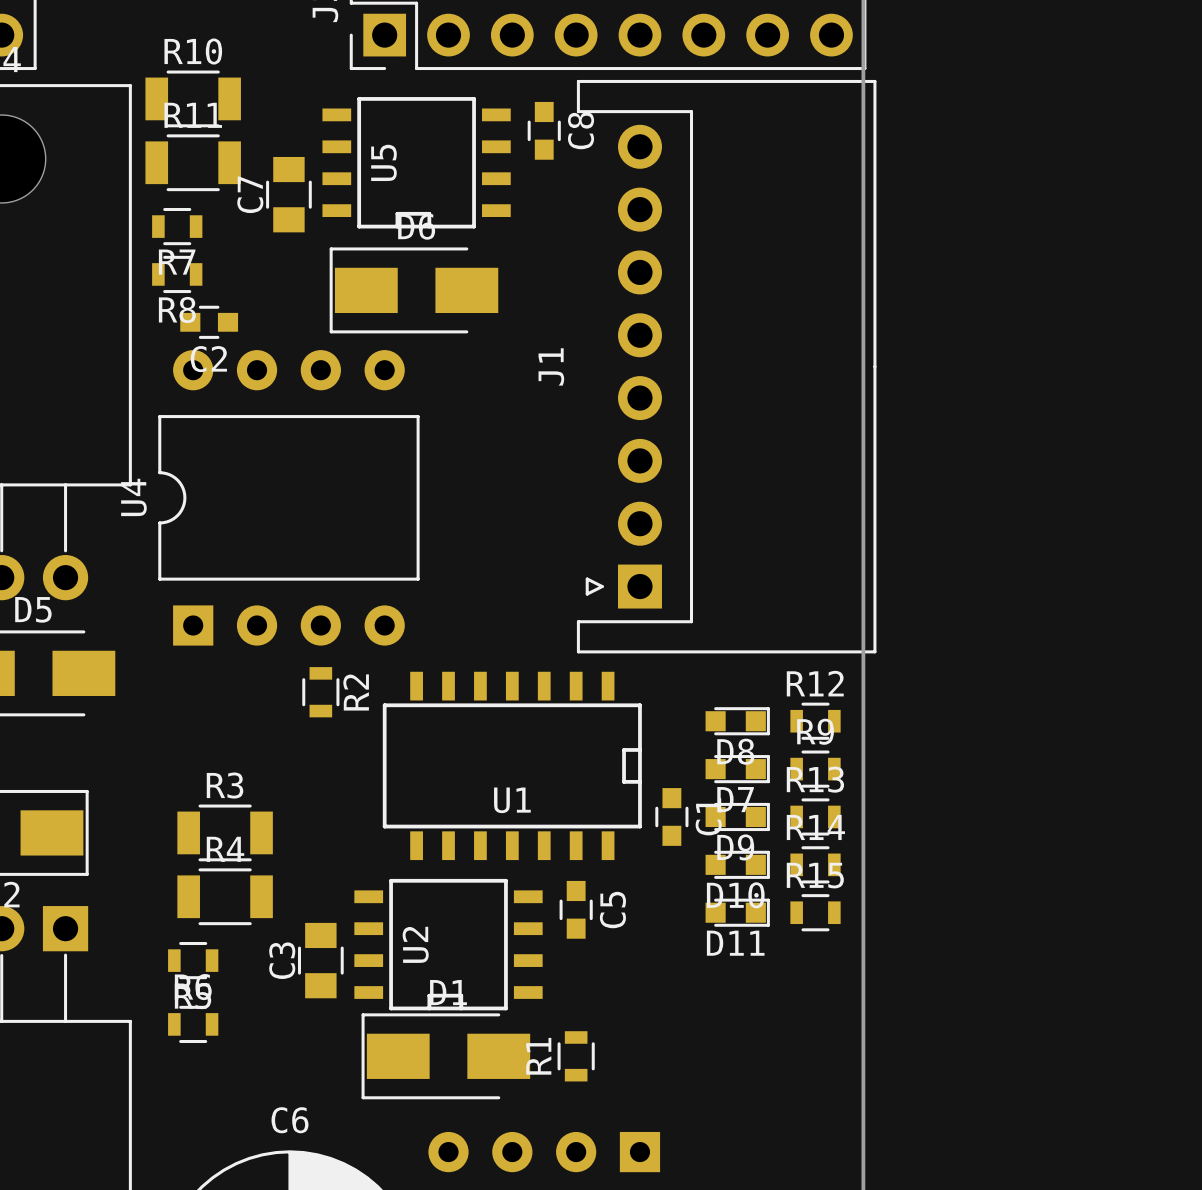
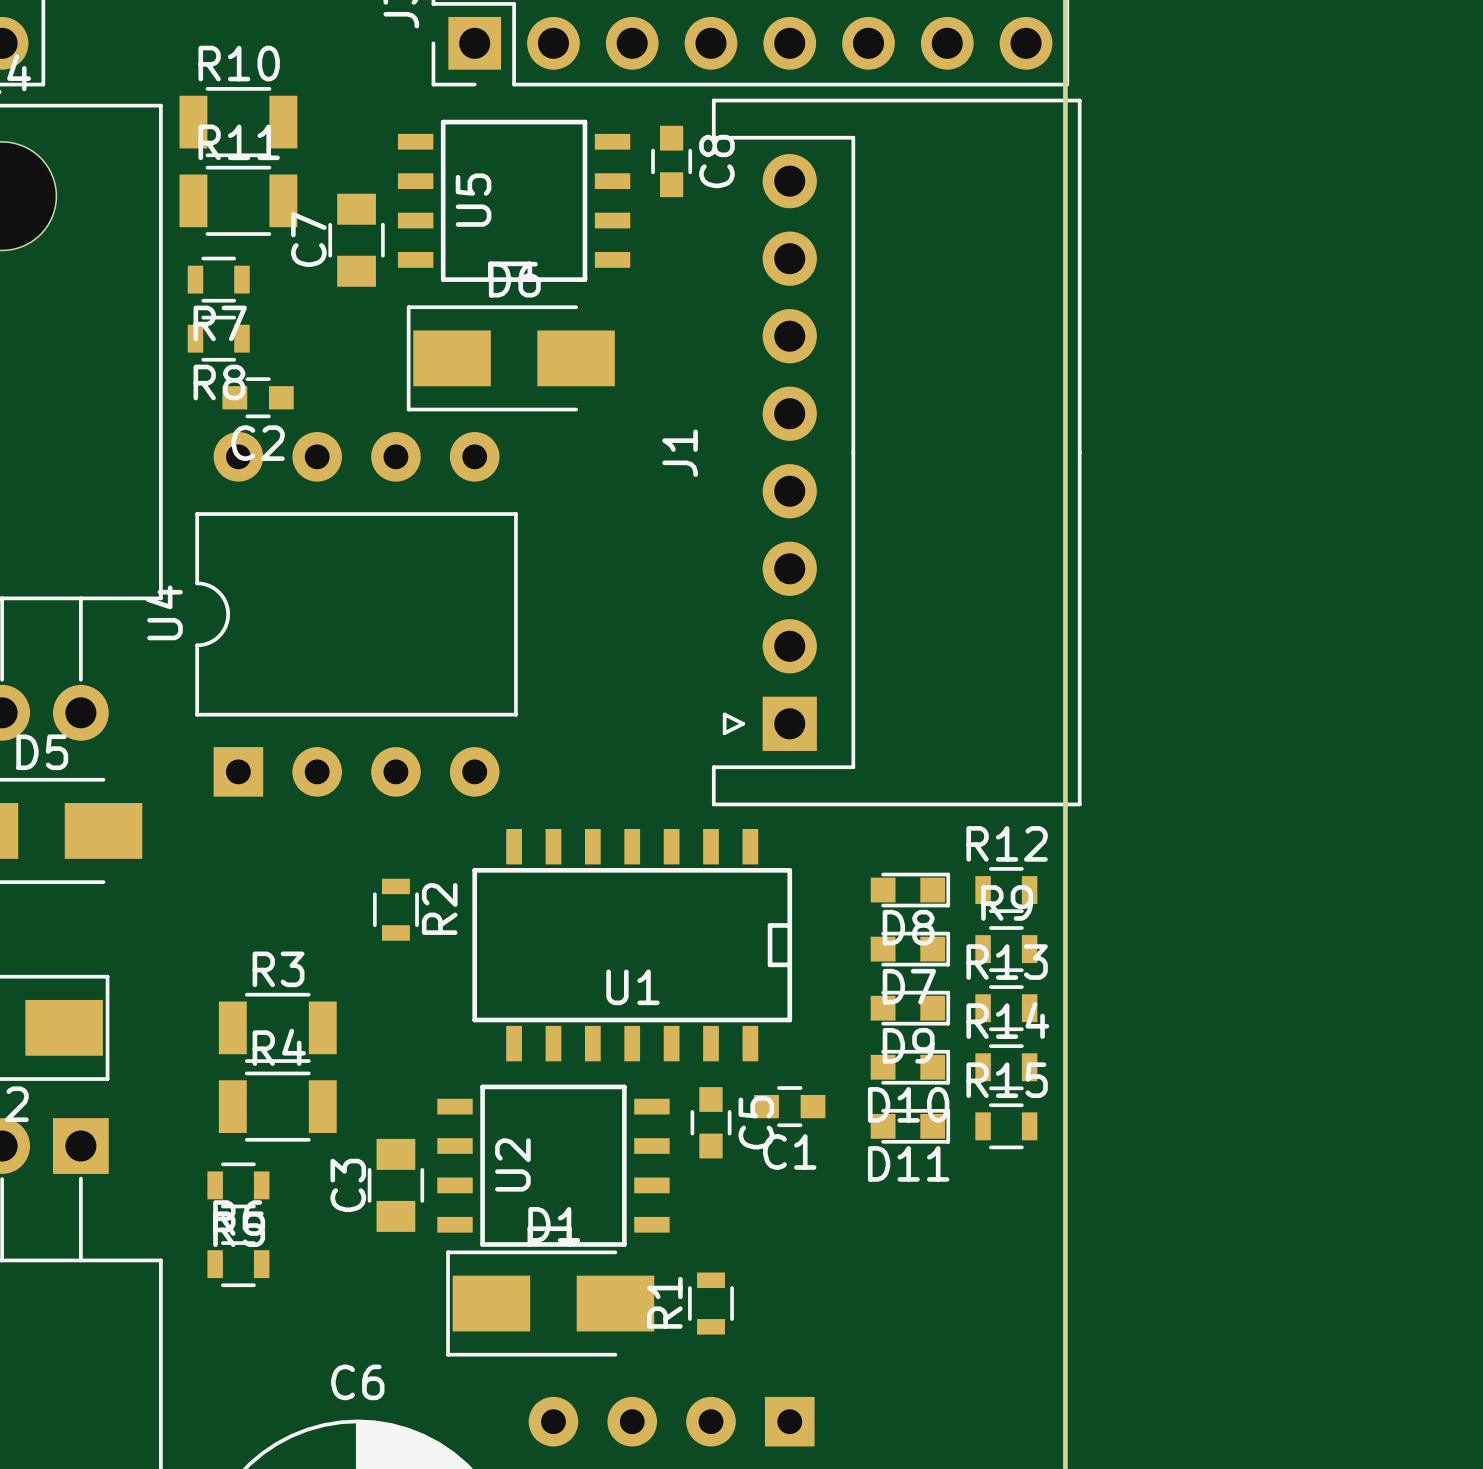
R2 position: (320, 692) -> (395, 909)
C1 rotation: 0° (671, 816) -> 90° clockwise (789, 1106)
C1 position: (671, 816) -> (789, 1106)

